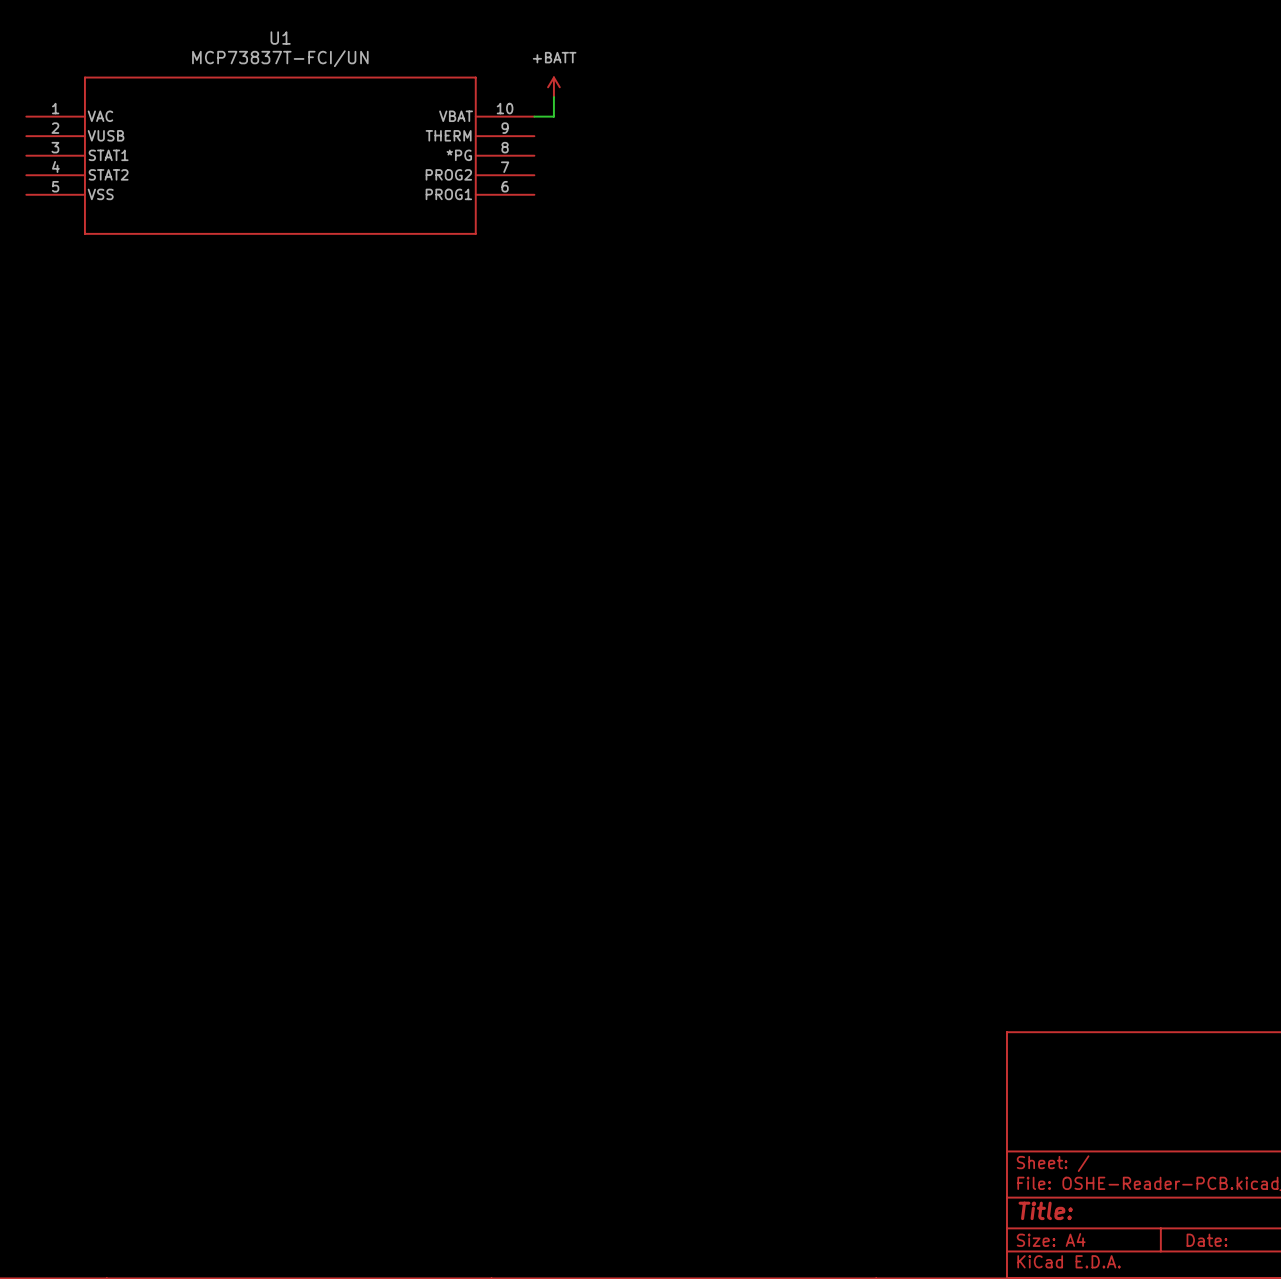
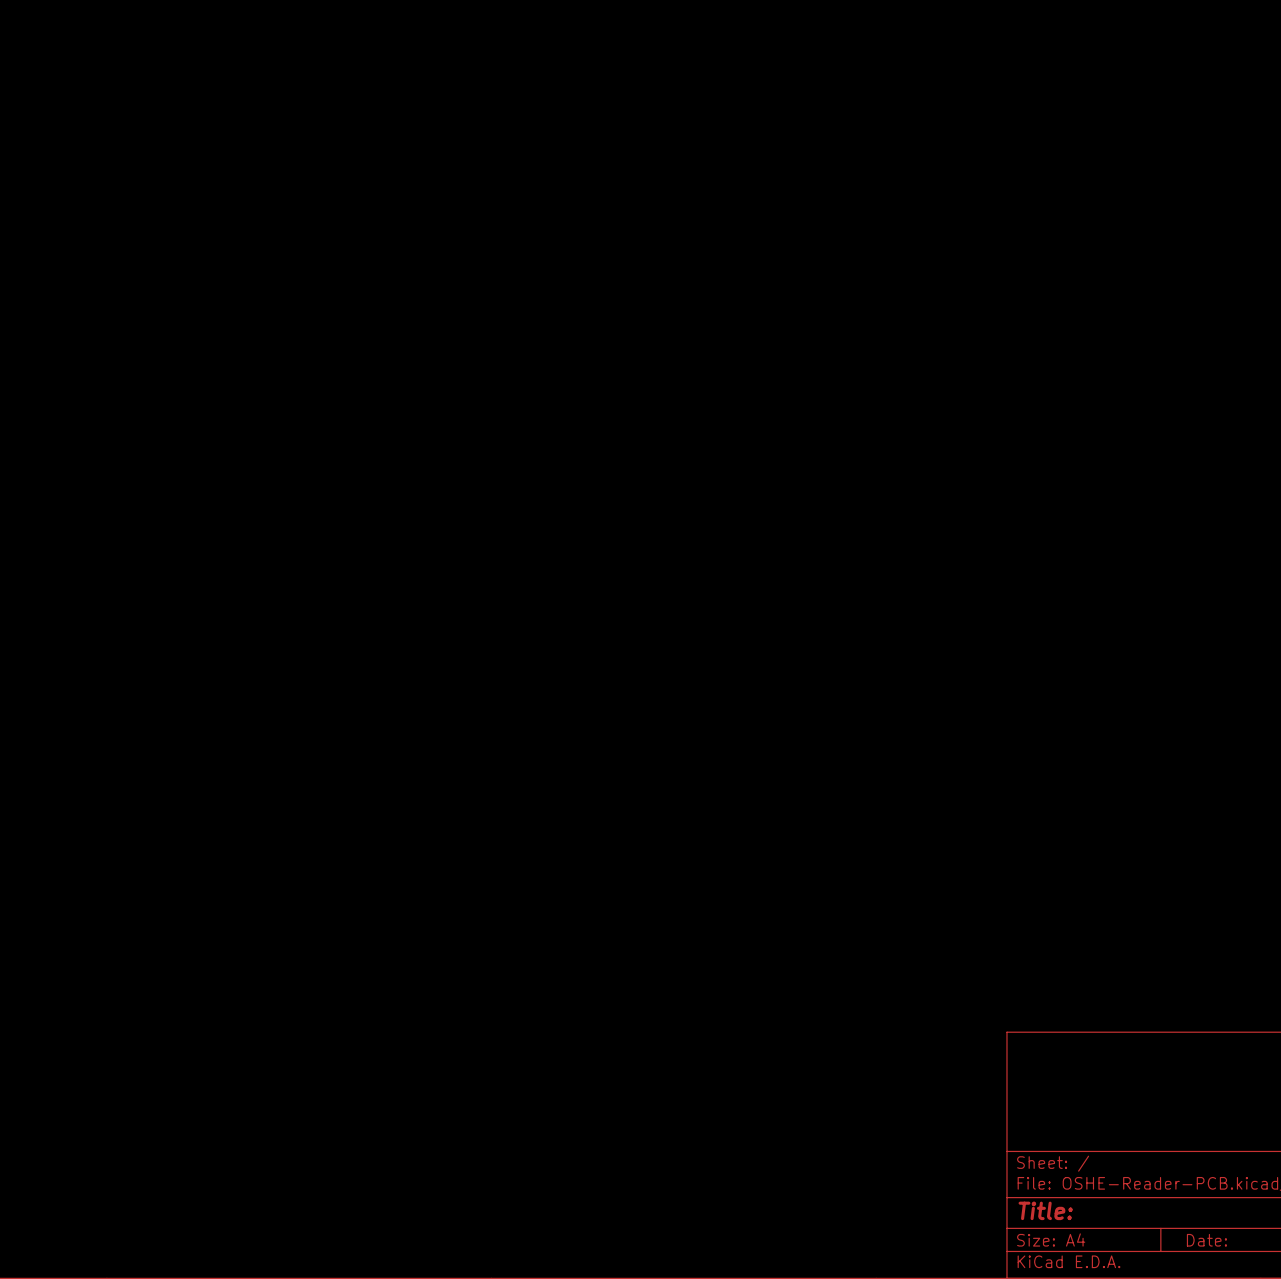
power symbol: +BATT (553, 87) -> none
wire: (553, 97) (553, 116) (534, 116) -> none
U1: MCP73837T-FCI/UN (280, 155) -> none

